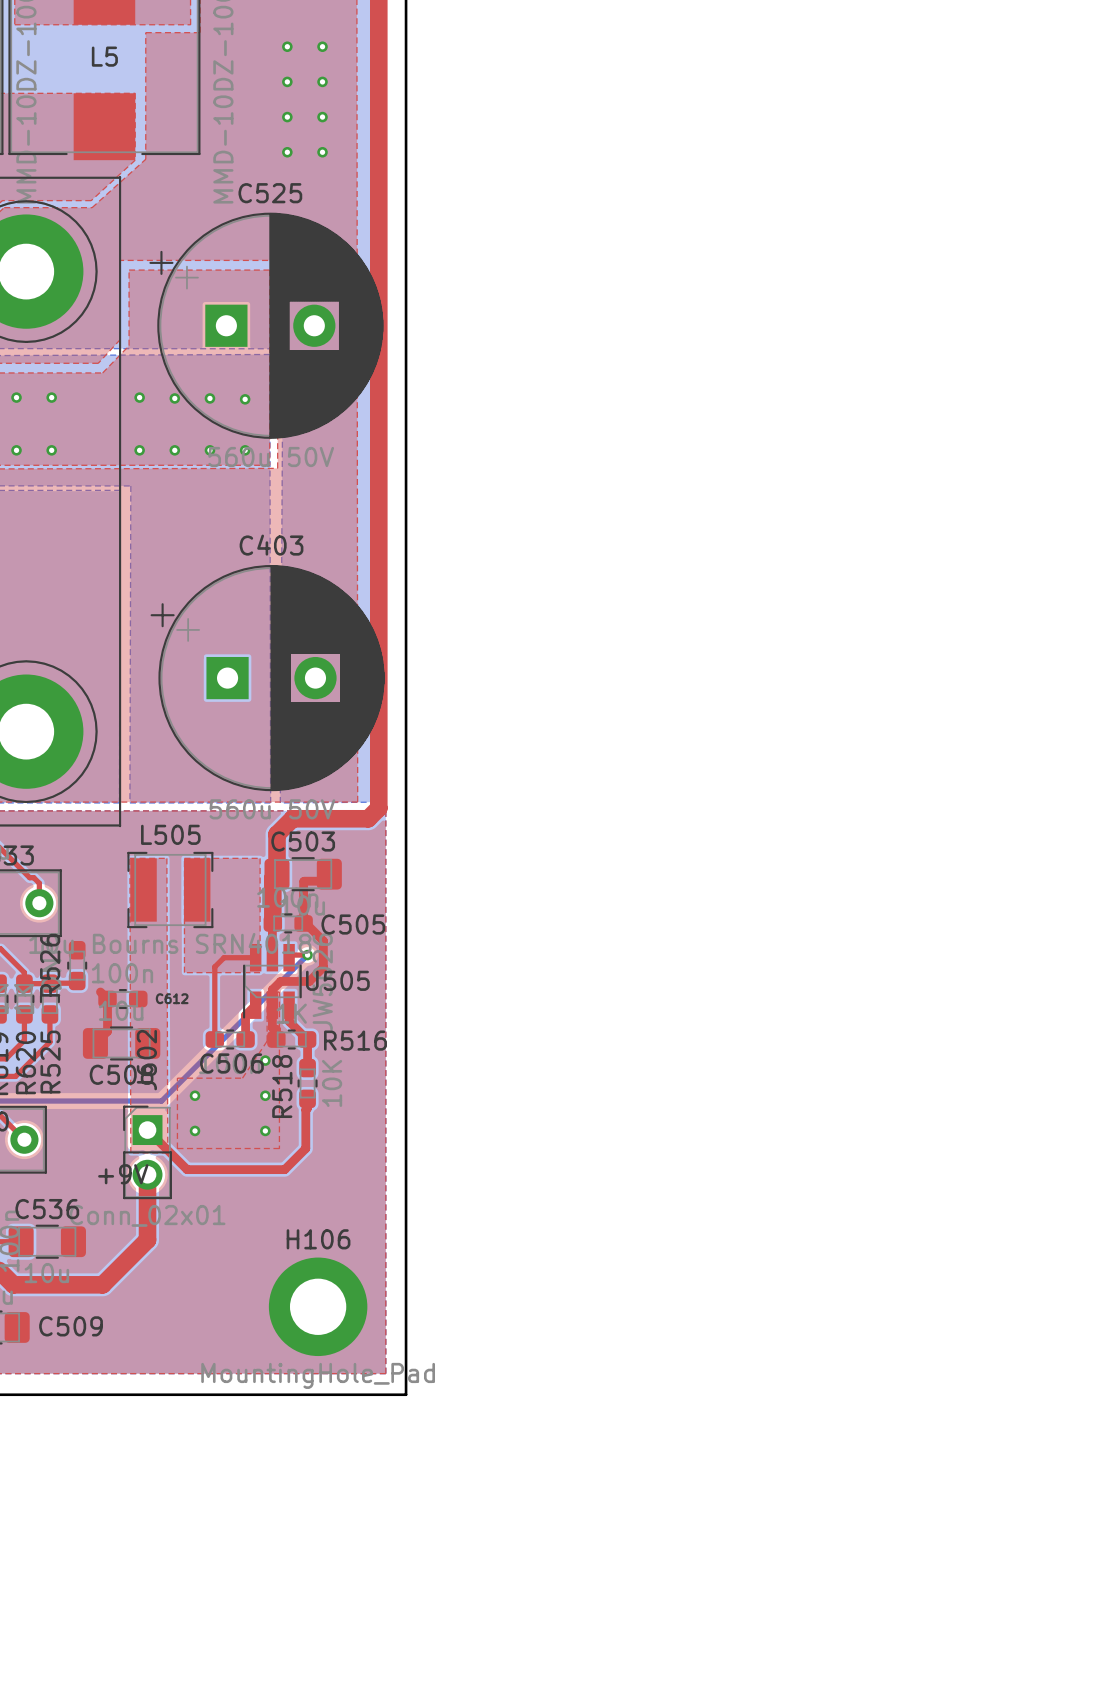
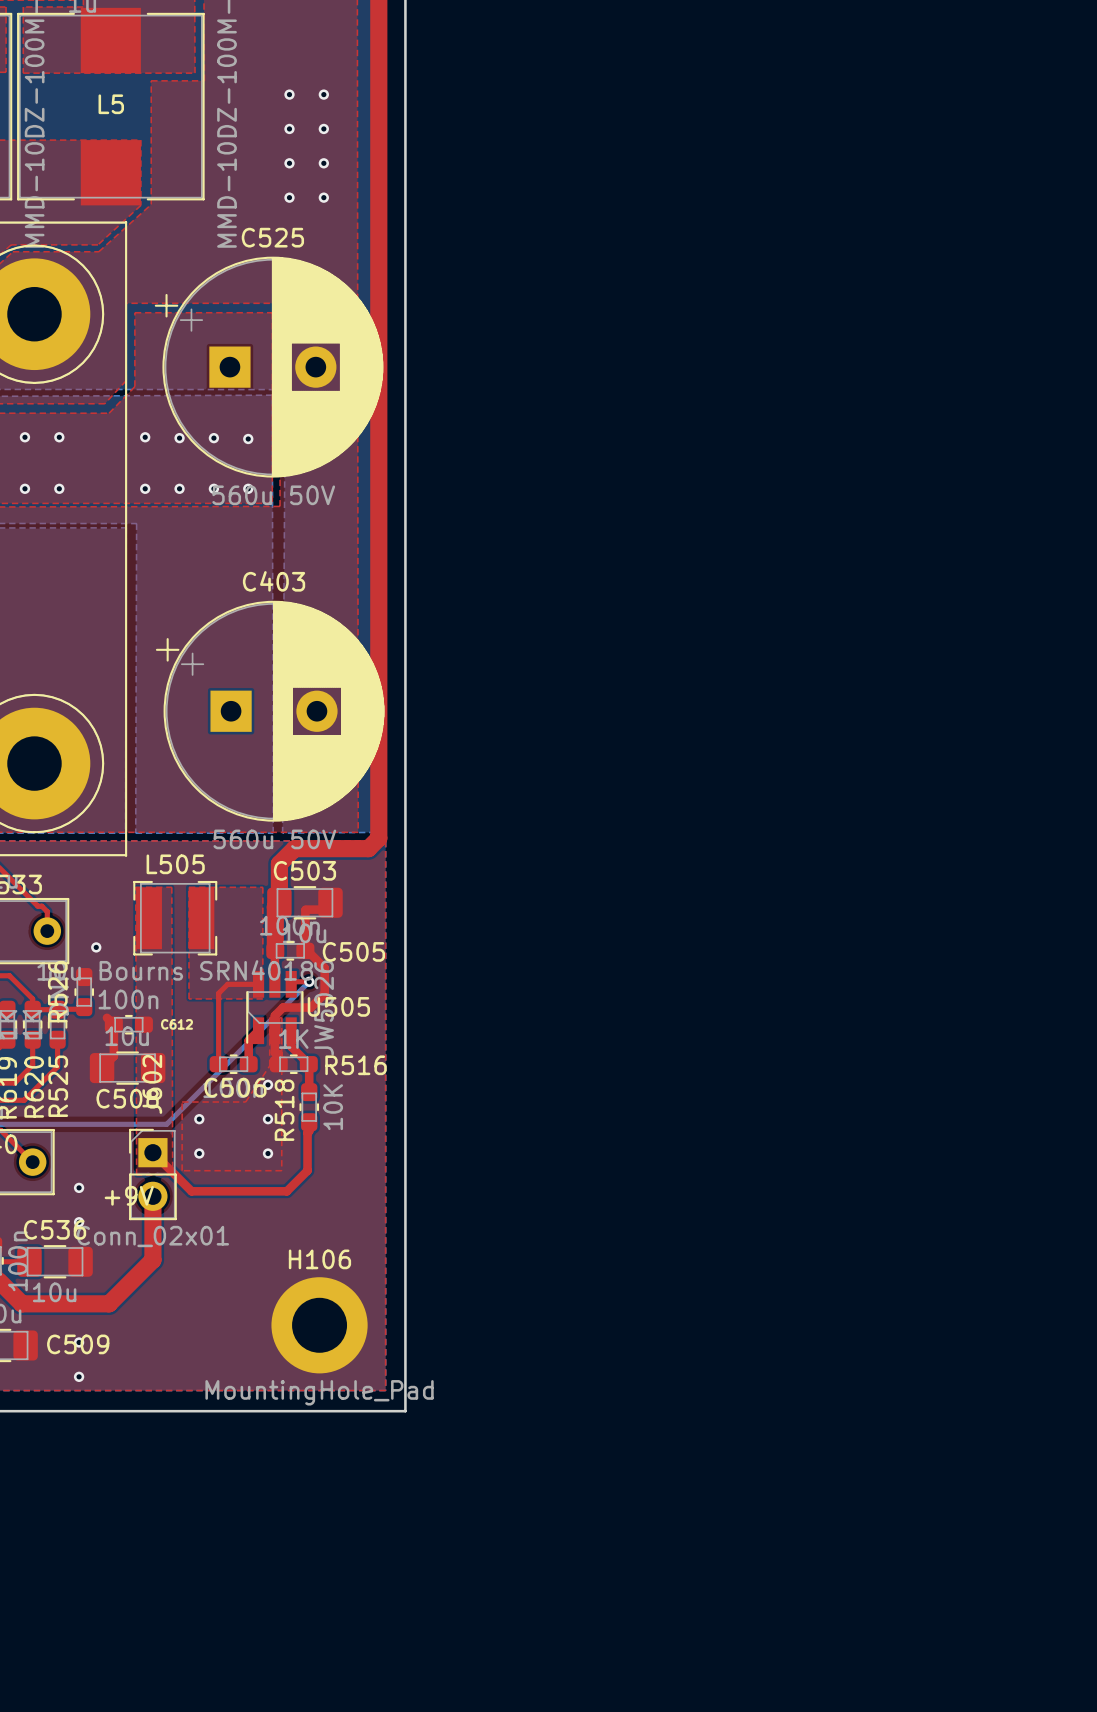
via: none -> (96, 947)
via: none -> (79, 1187)
via: none -> (79, 1222)
via: none -> (79, 1342)
via: none -> (79, 1376)

